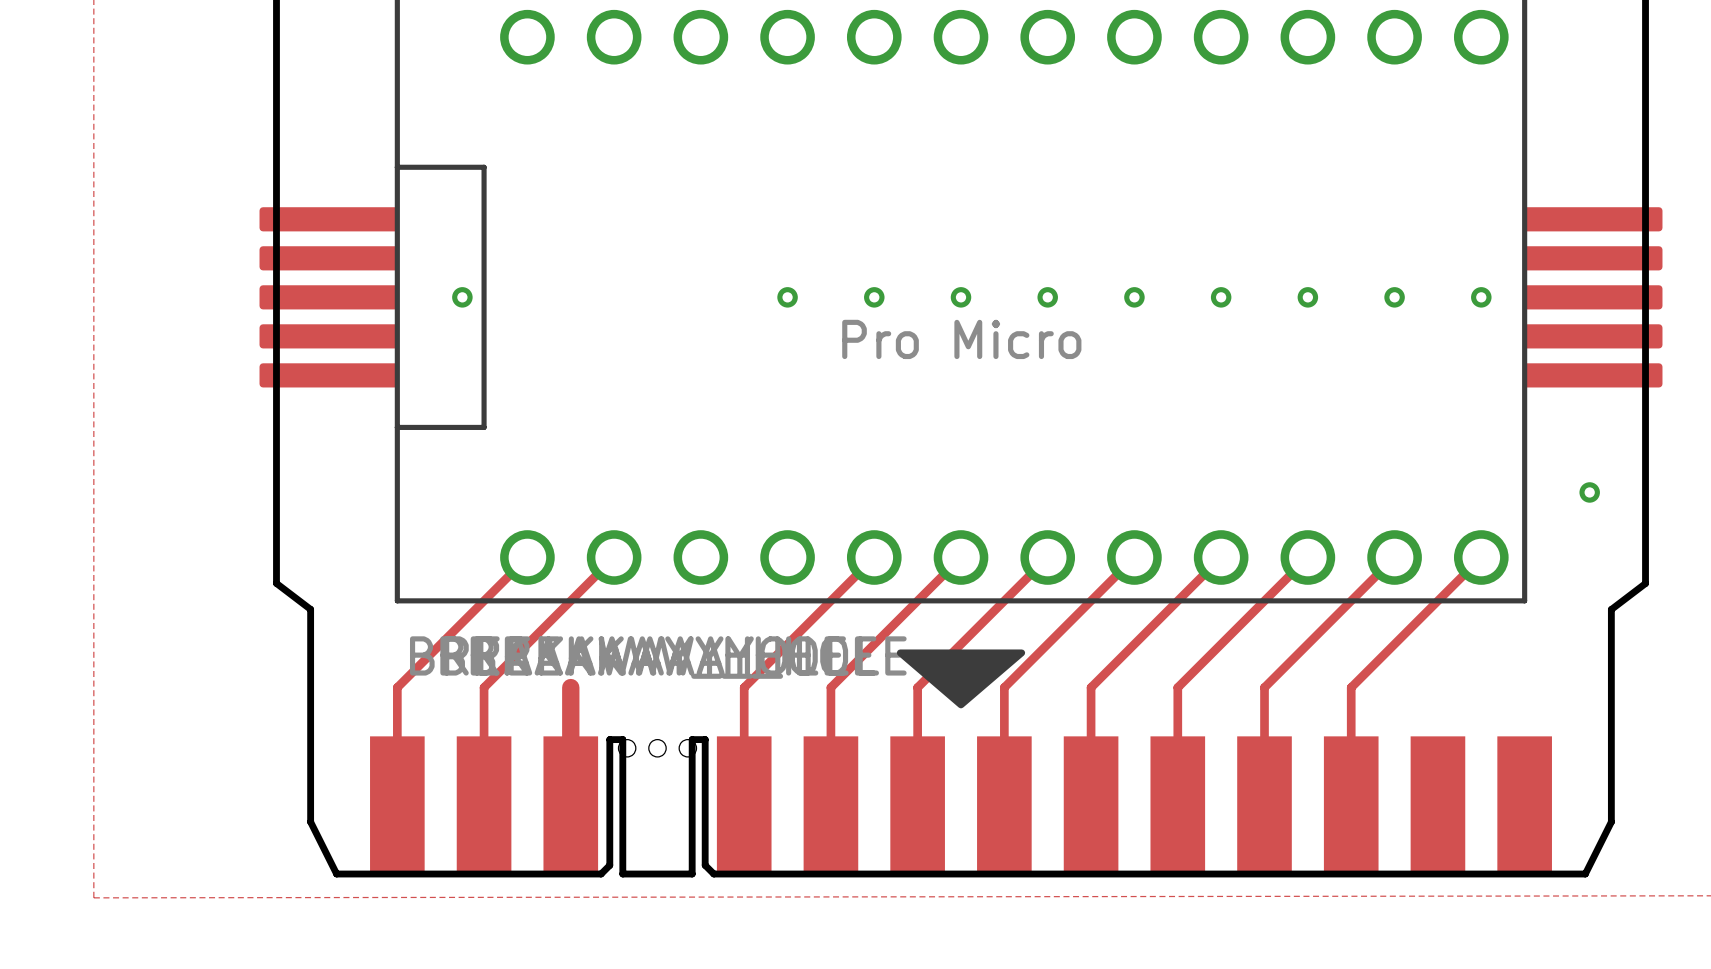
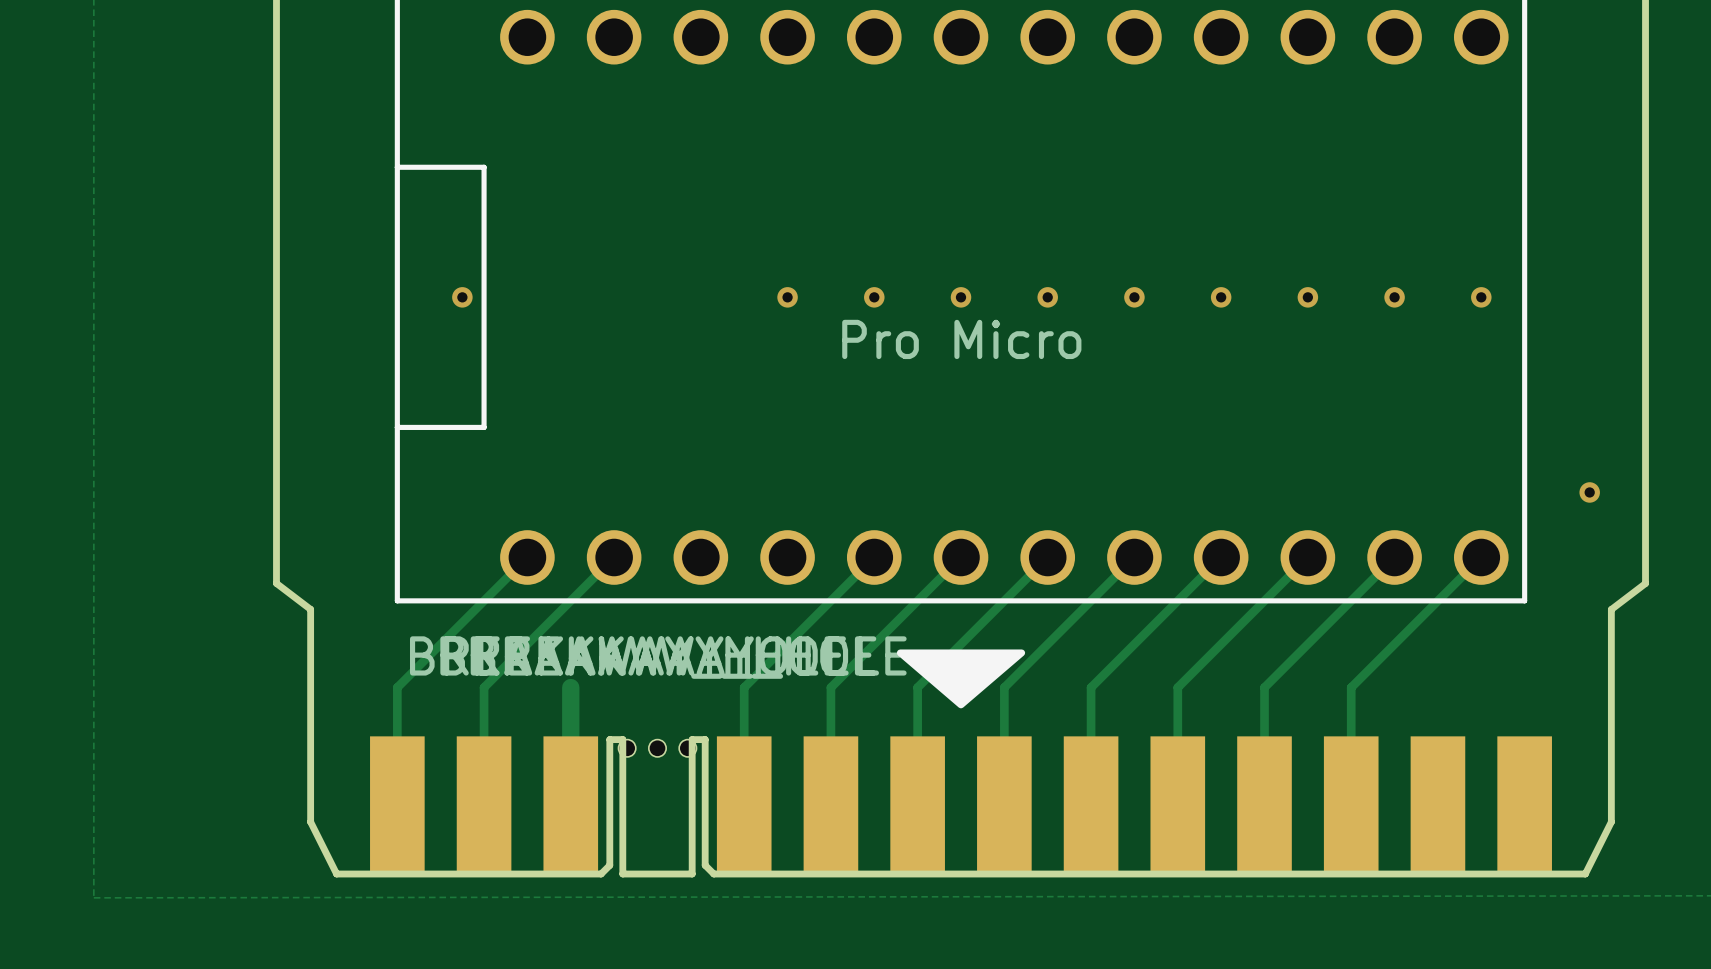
drawing: [259, 207, 399, 388] -> none
drawing: [1523, 207, 1663, 388] -> none

